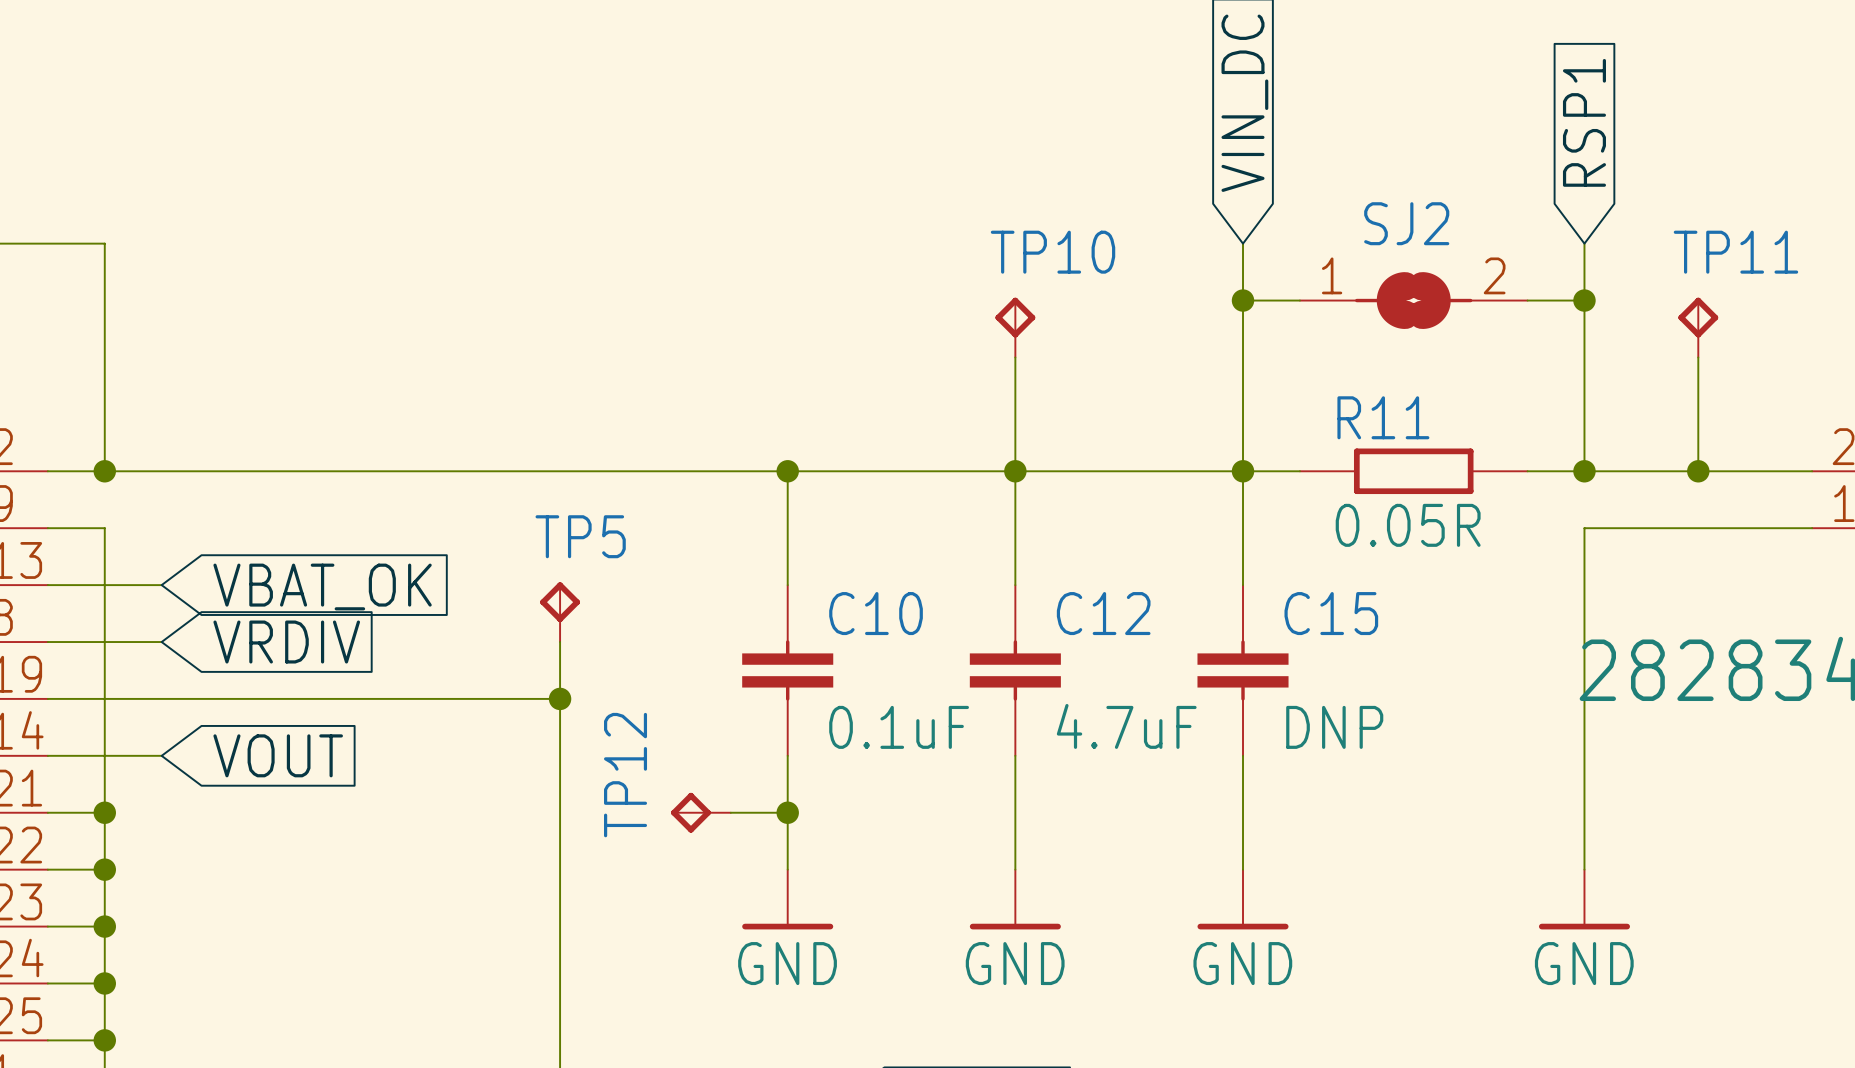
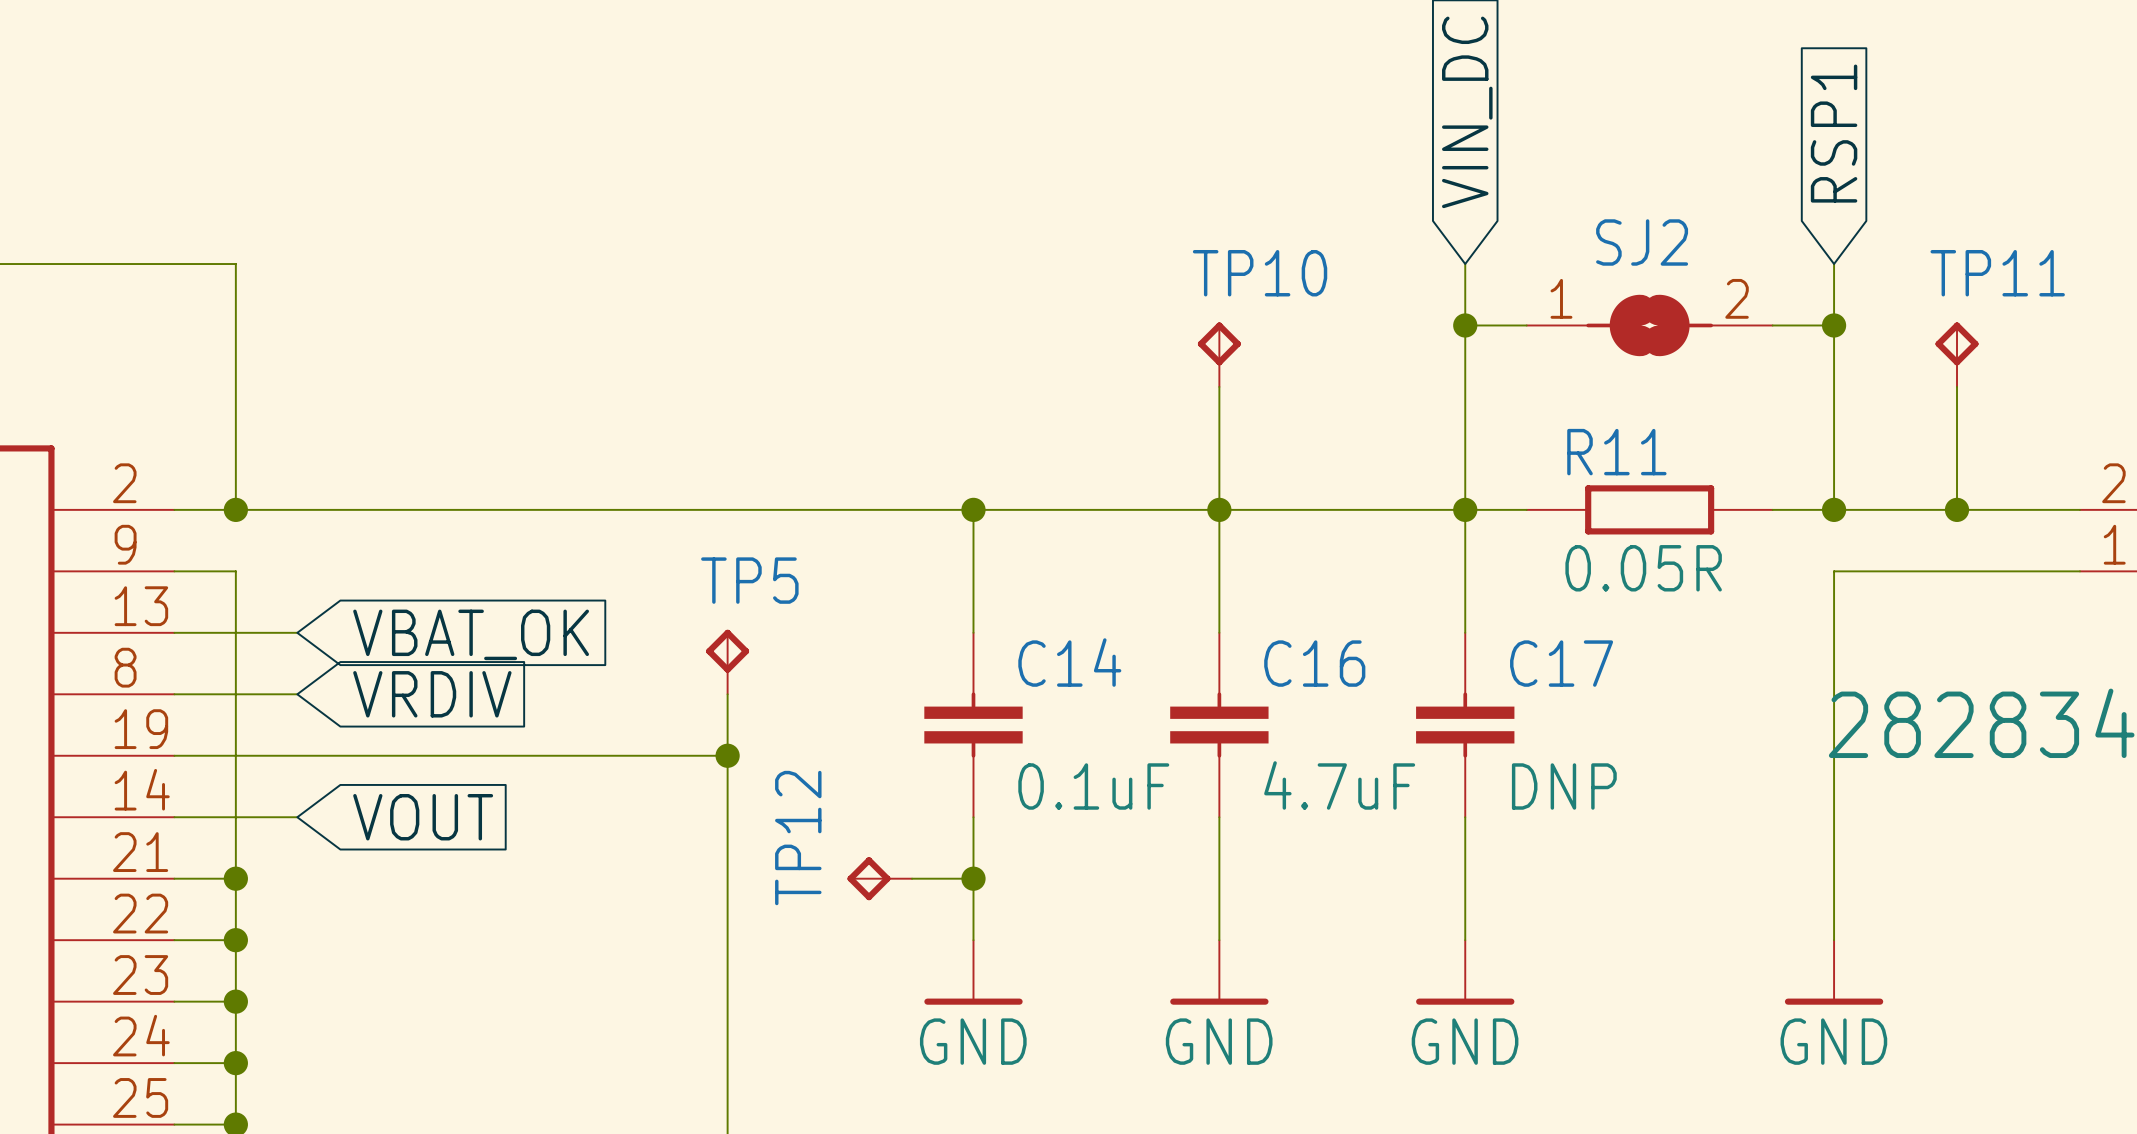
C10 name: C10 (876, 613) -> C14 (1069, 662)
C12 name: C12 (1103, 613) -> C16 (1314, 663)
C15 name: C15 (1331, 613) -> C17 (1561, 663)

